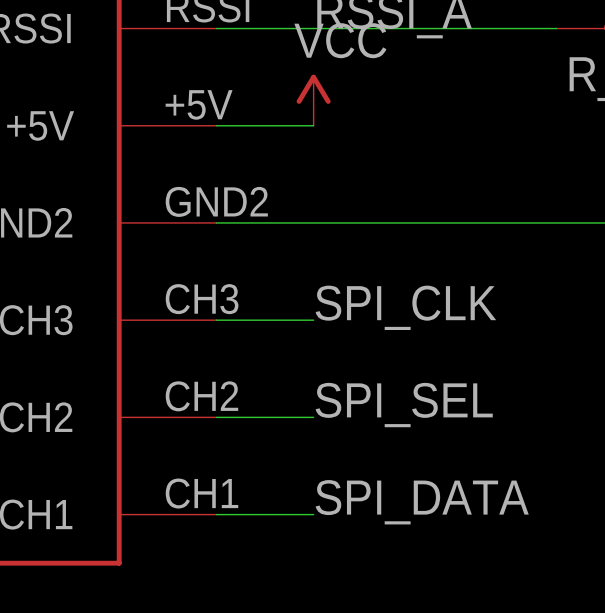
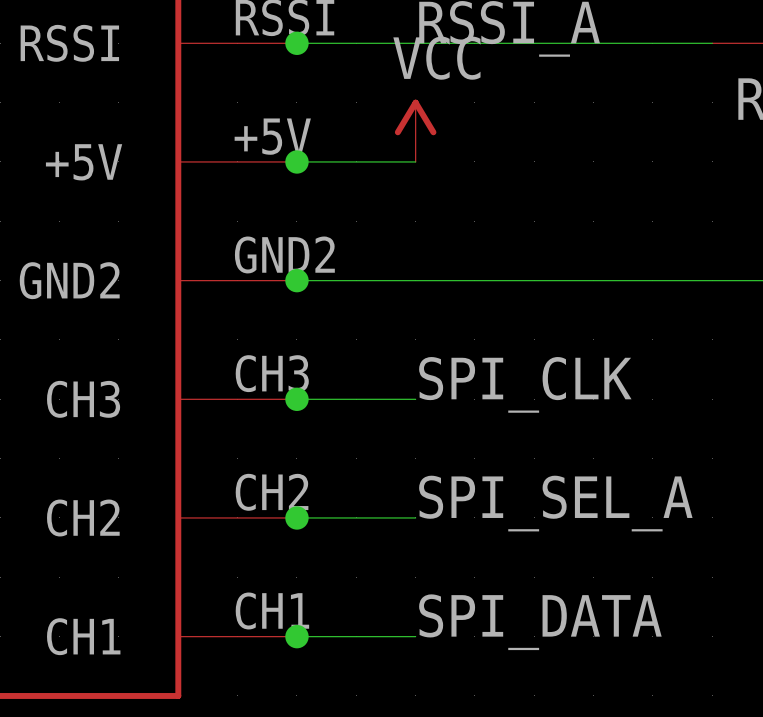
junction: none -> (296, 43)
junction: none -> (296, 161)
junction: none -> (296, 280)
junction: none -> (296, 399)
label: SPI_SEL (404, 405) -> SPI_SEL_A (555, 503)
junction: none -> (296, 517)
junction: none -> (296, 636)

